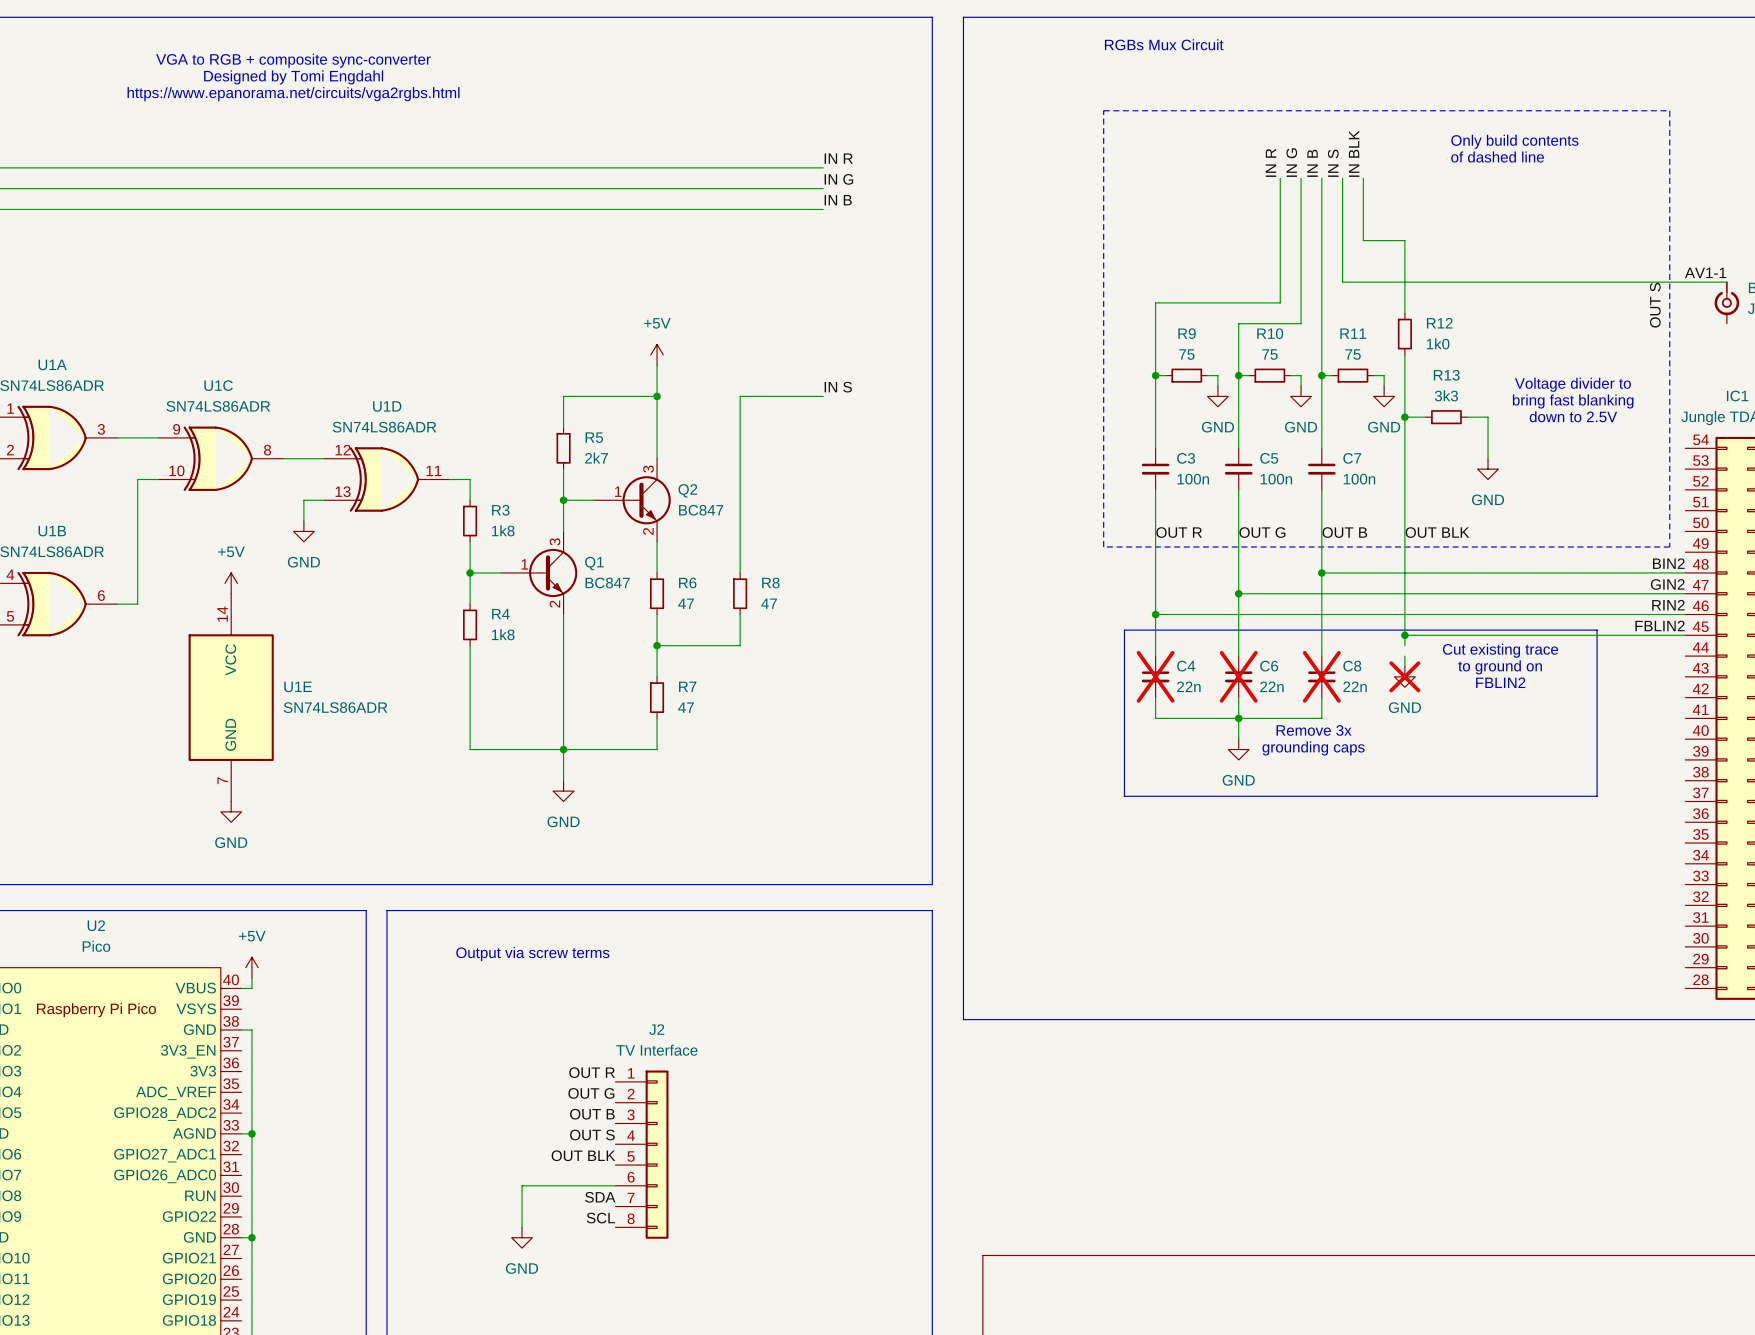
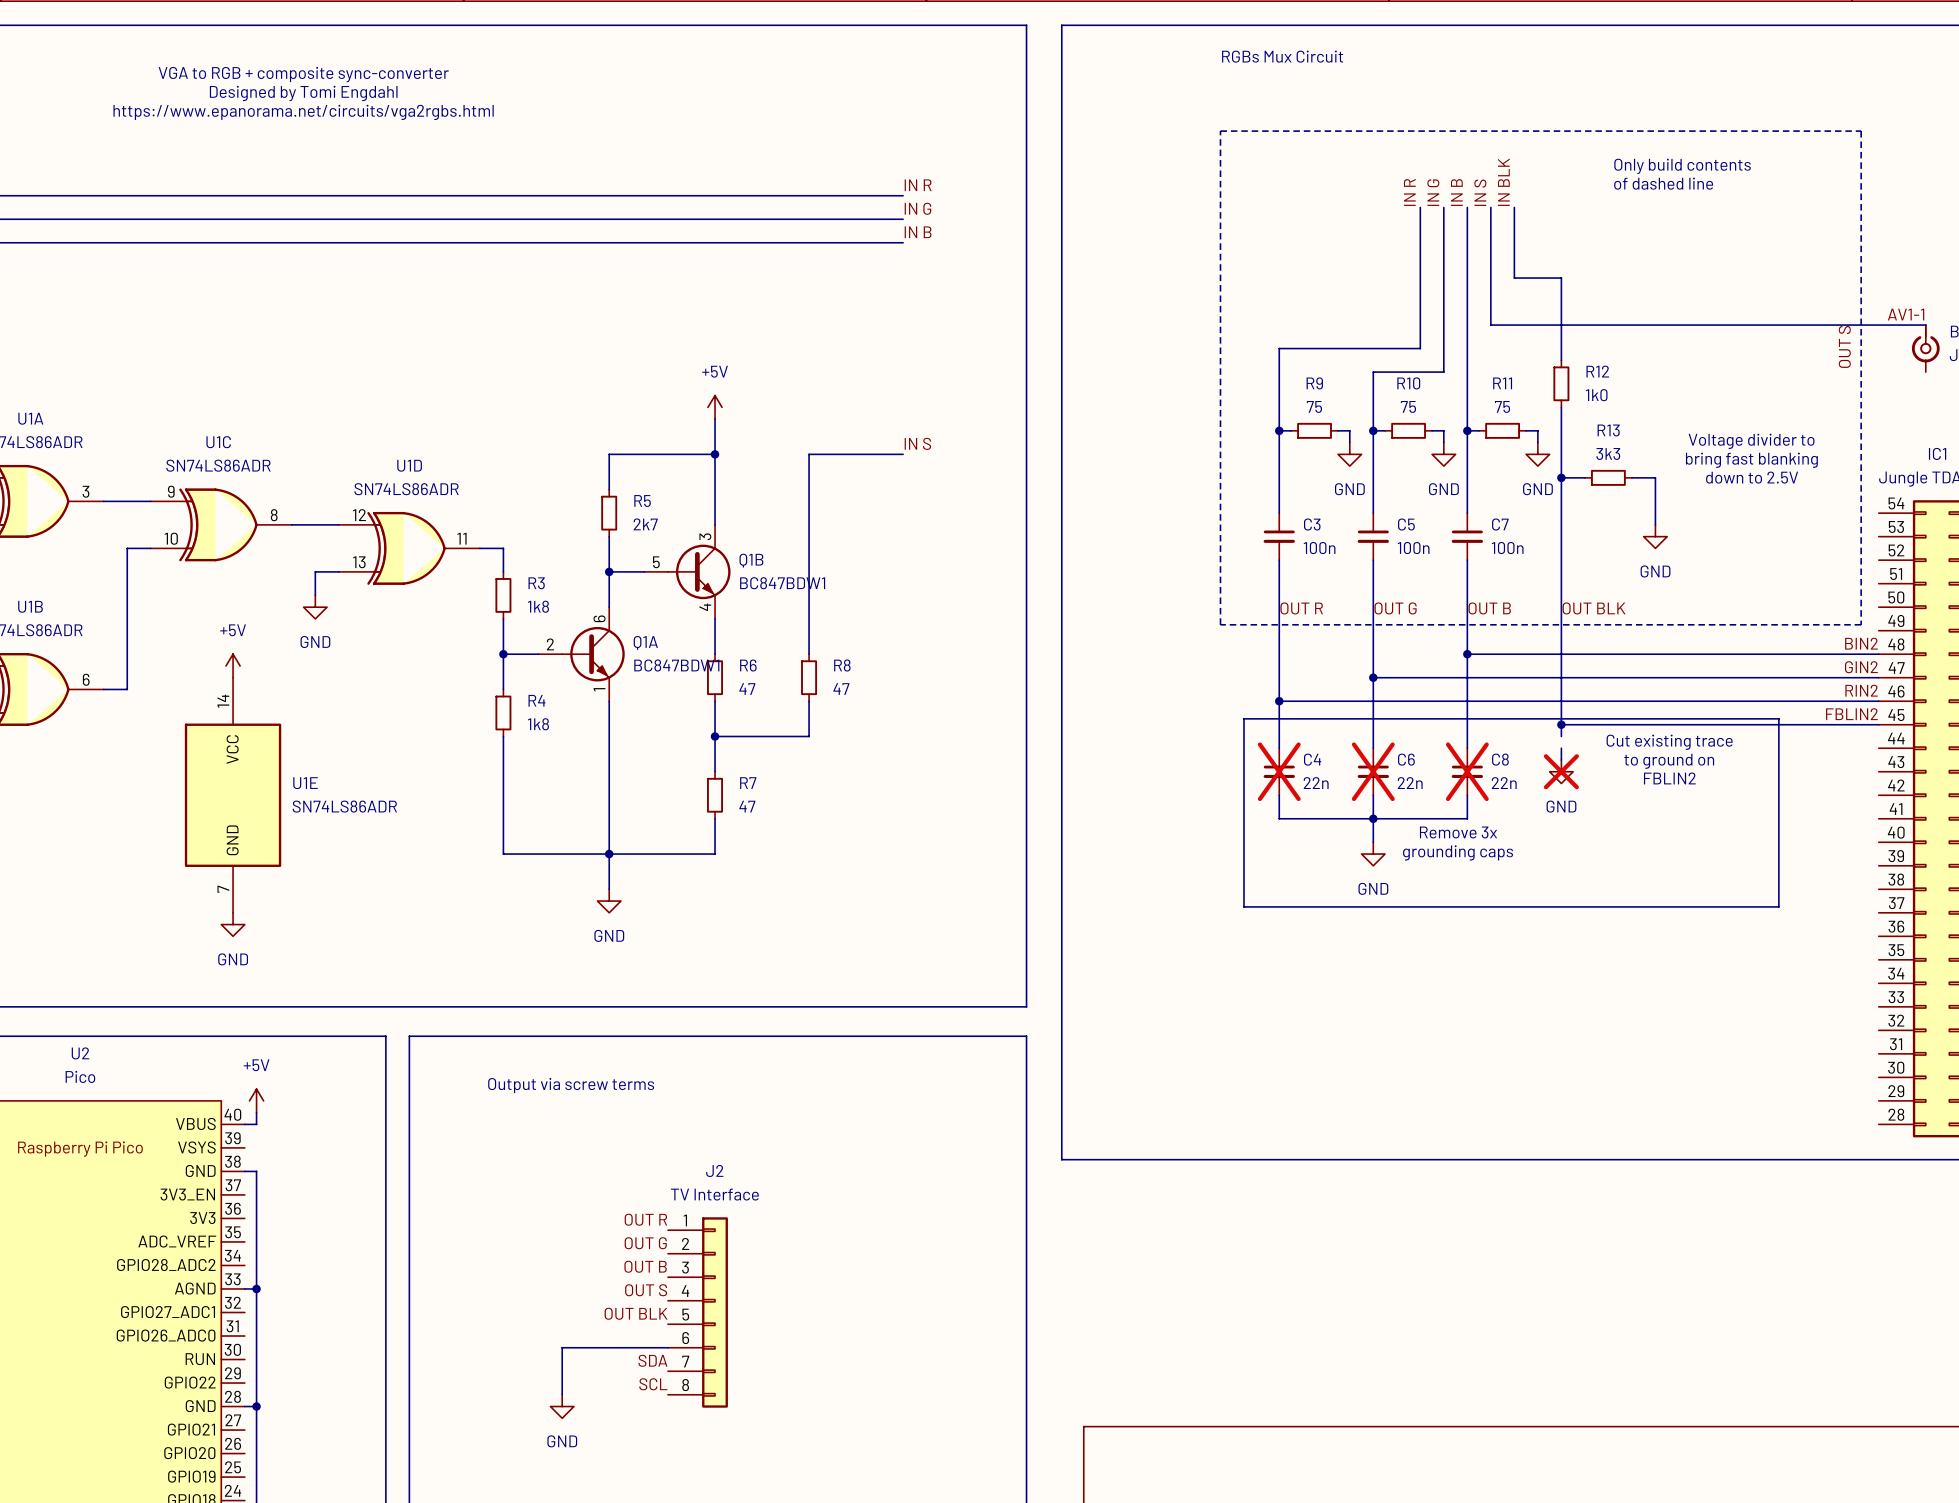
Q2: BC847 (632, 500) -> none
Q1B: none -> BC847BDW1 (687, 571)
Q1: BC847 (539, 572) -> none
Q1A: none -> BC847BDW1 (581, 654)

